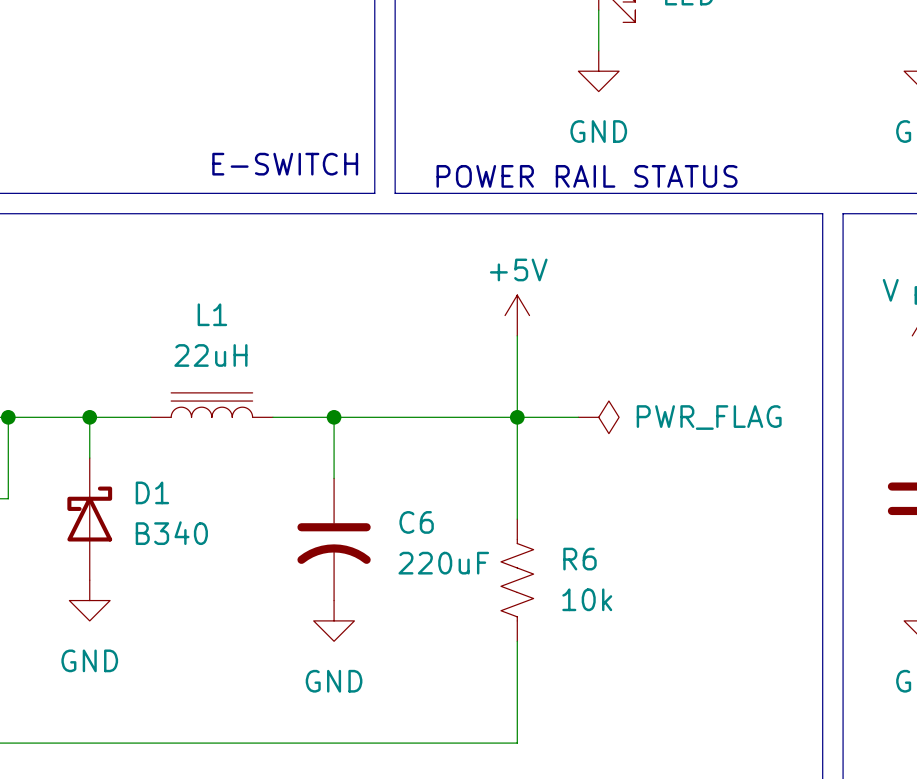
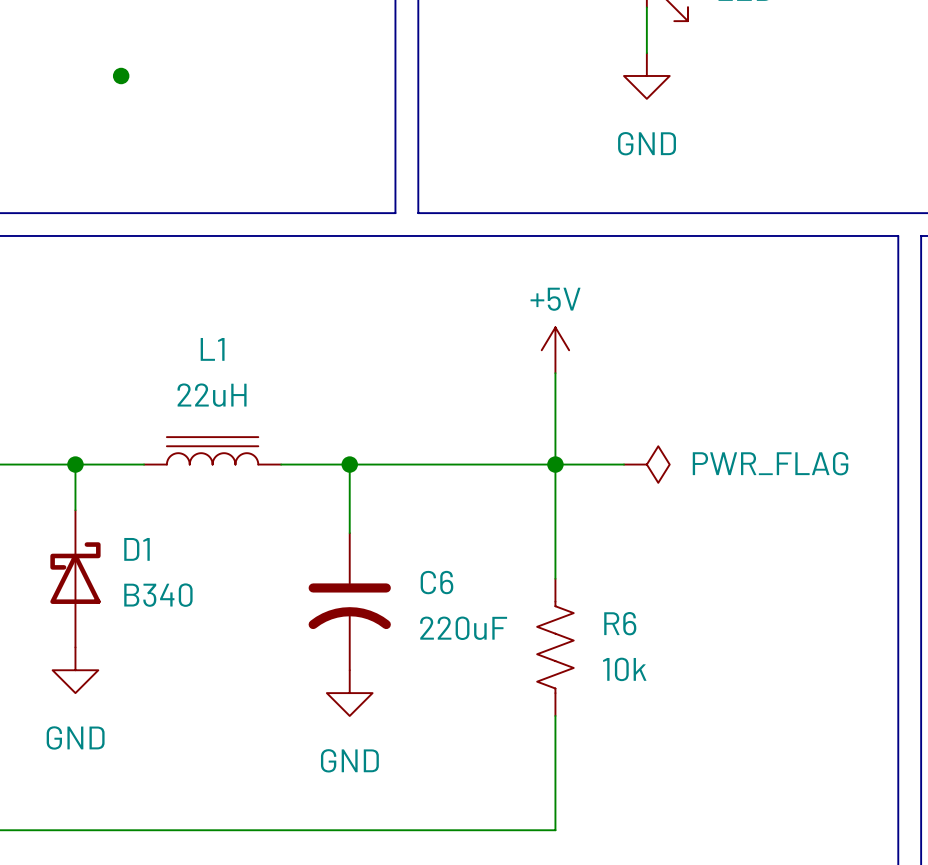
junction: none -> (121, 75)
text: E-SWITCH (285, 164) -> none
text: POWER RAIL STATUS (587, 176) -> none

